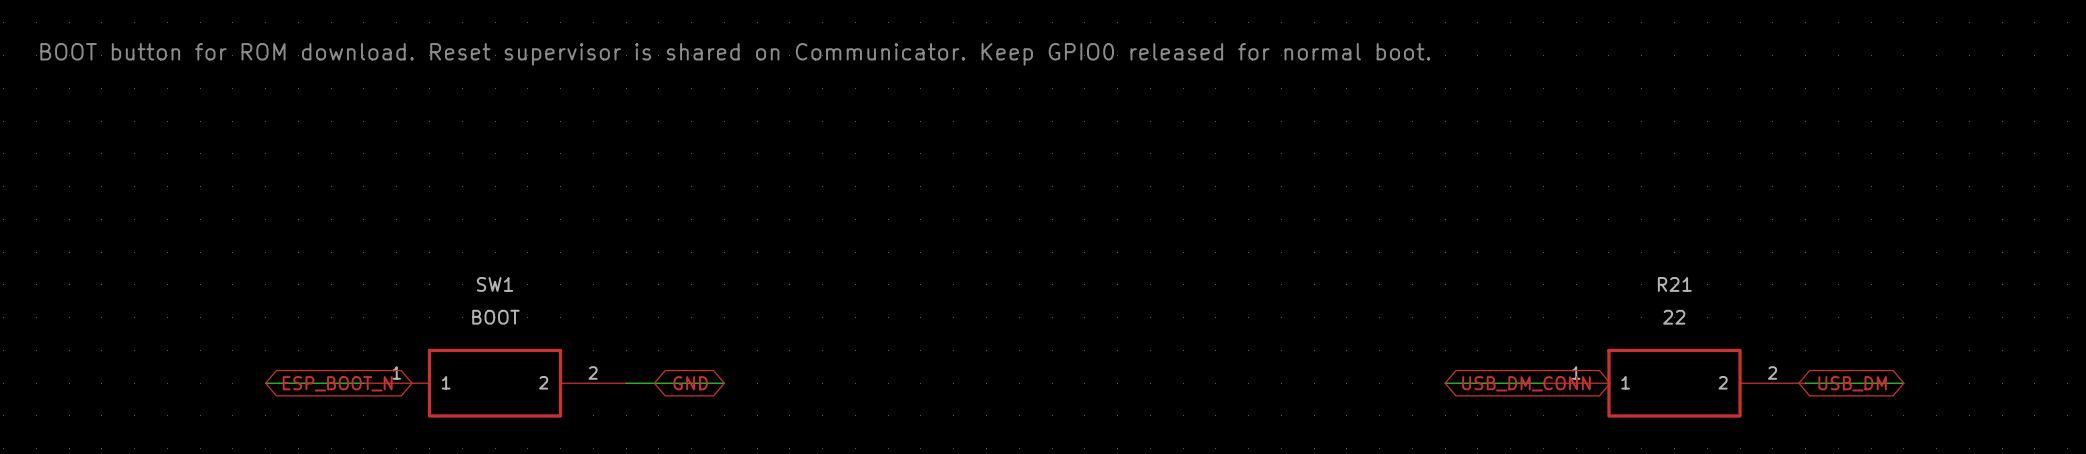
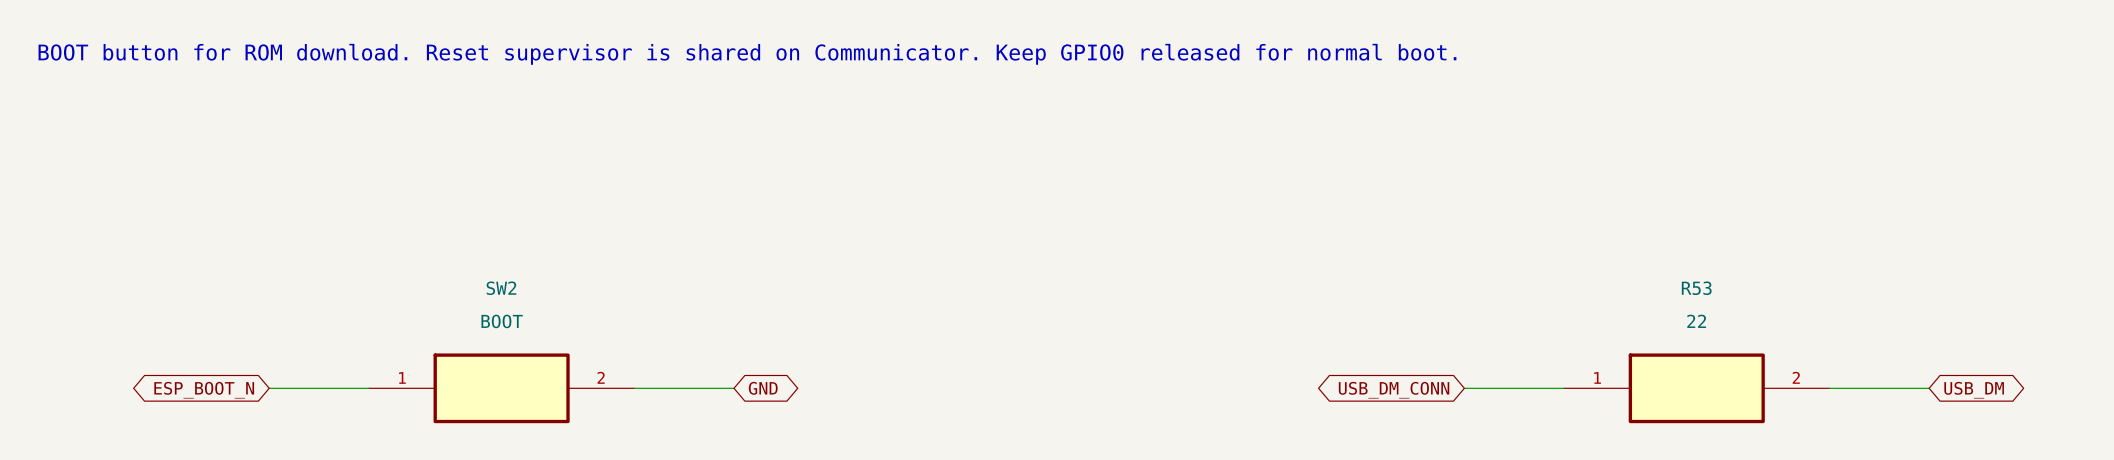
SW1 name: SW1 (495, 284) -> SW2 (501, 288)
R21 name: R21 (1674, 284) -> R53 (1696, 288)
SW1 pin name: 1 (446, 382) -> none
SW1 pin name: 2 (543, 382) -> none
R21 pin name: 1 (1625, 382) -> none
R21 pin name: 2 (1723, 382) -> none
global label rotation: 0° (337, 383) -> 180° (204, 390)
global label rotation: 0° (690, 383) -> 180° (763, 388)
global label position: GND (690, 383) -> GND (763, 388)
global label rotation: 0° (1526, 383) -> 180° (1394, 390)
global label rotation: 0° (1852, 383) -> 180° (1974, 390)

